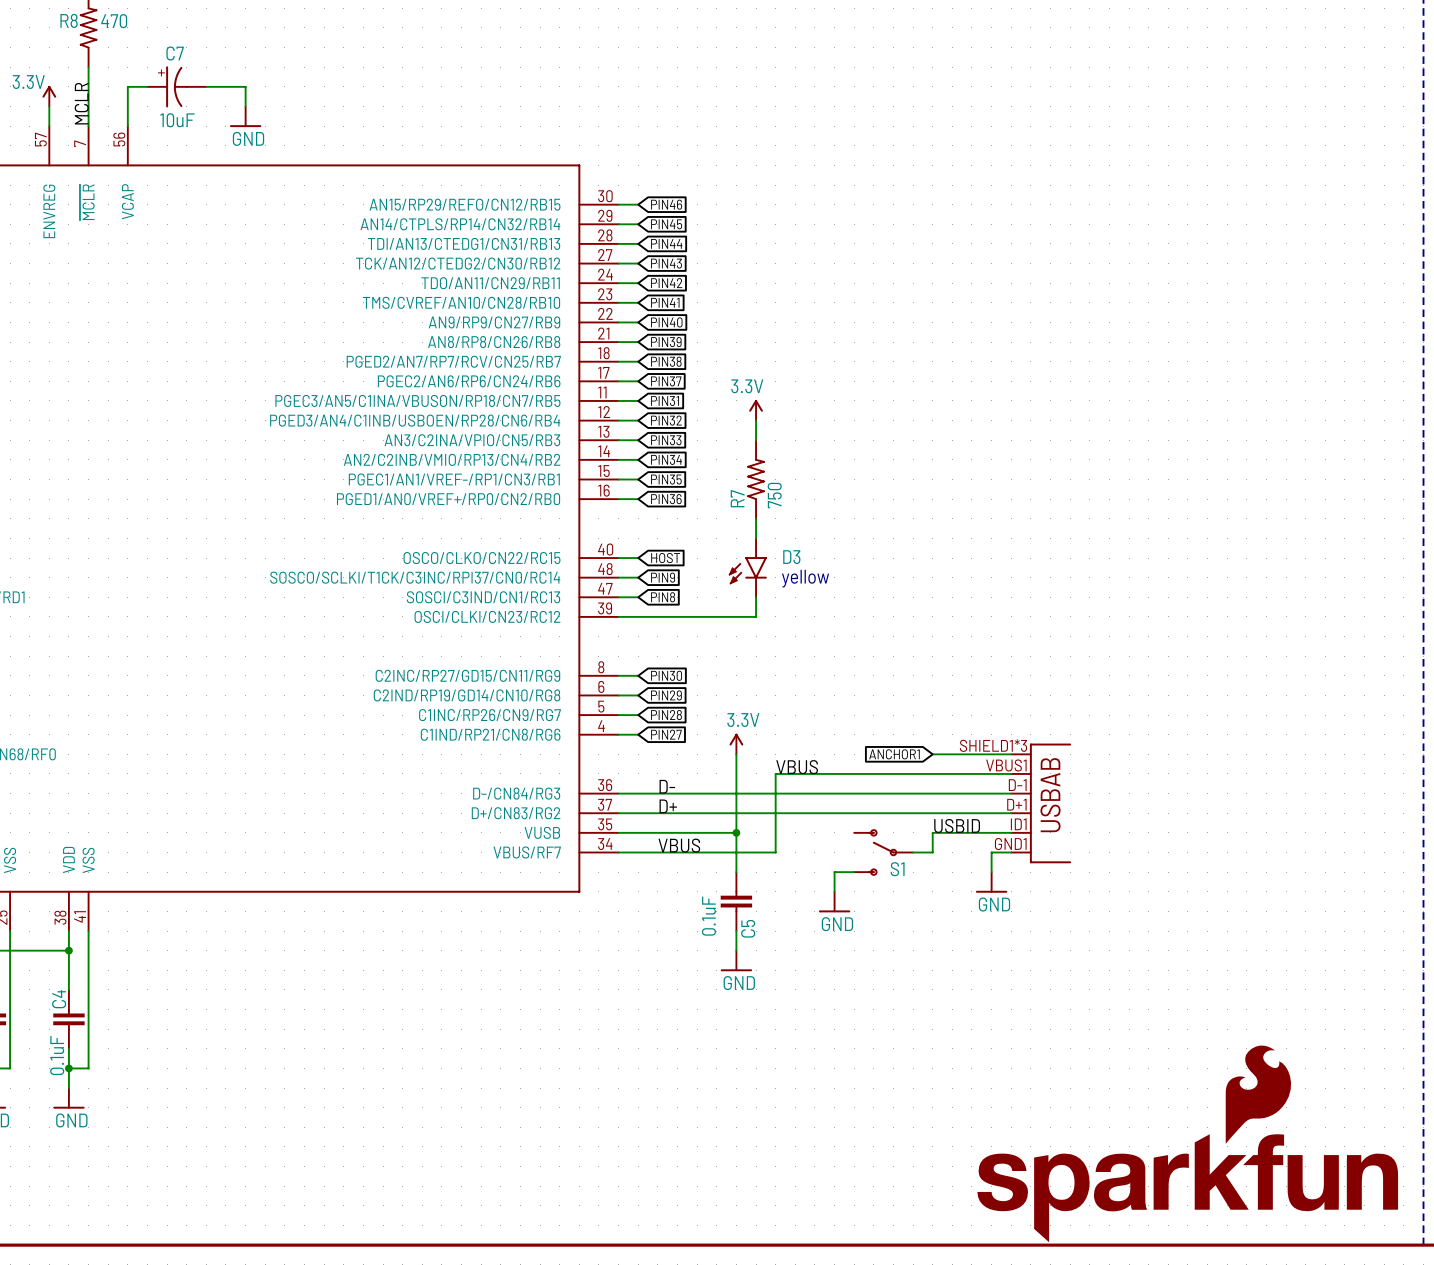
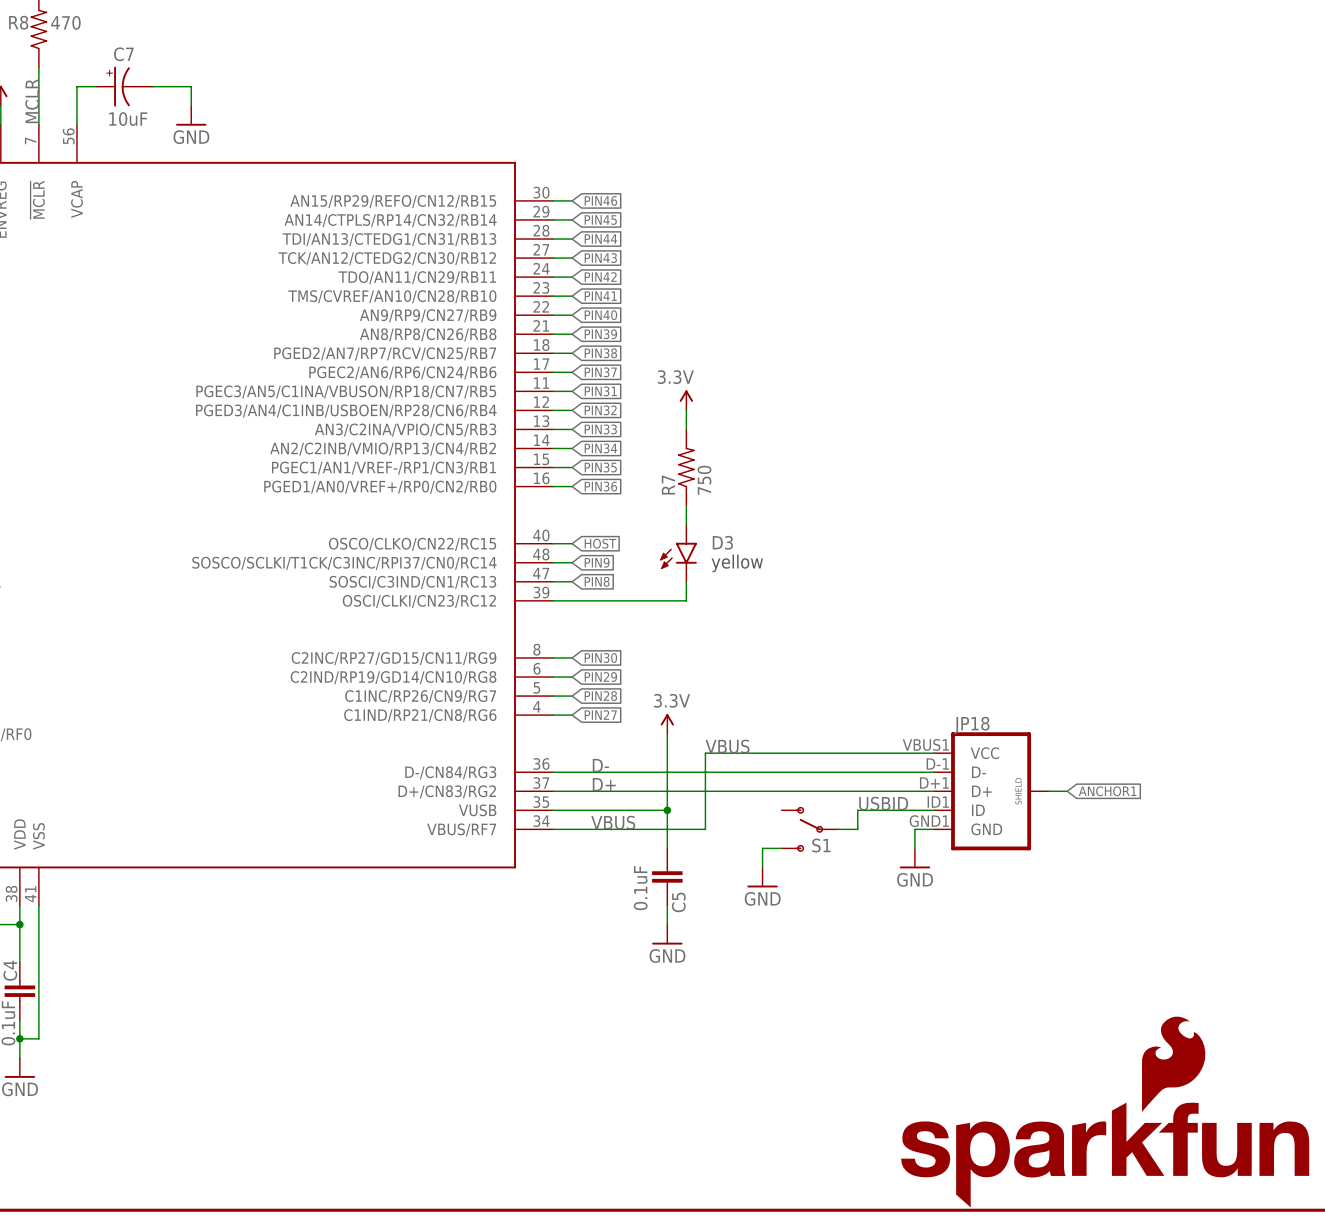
global label: ANCHOR1 (894, 754) -> none
wire: (932, 754) (1011, 754) -> none
part: (1041, 803) -> none
JP18: none -> (991, 791)
wire: none -> (1048, 791) (1067, 791)
global label: none -> ANCHOR1 (1107, 791)

